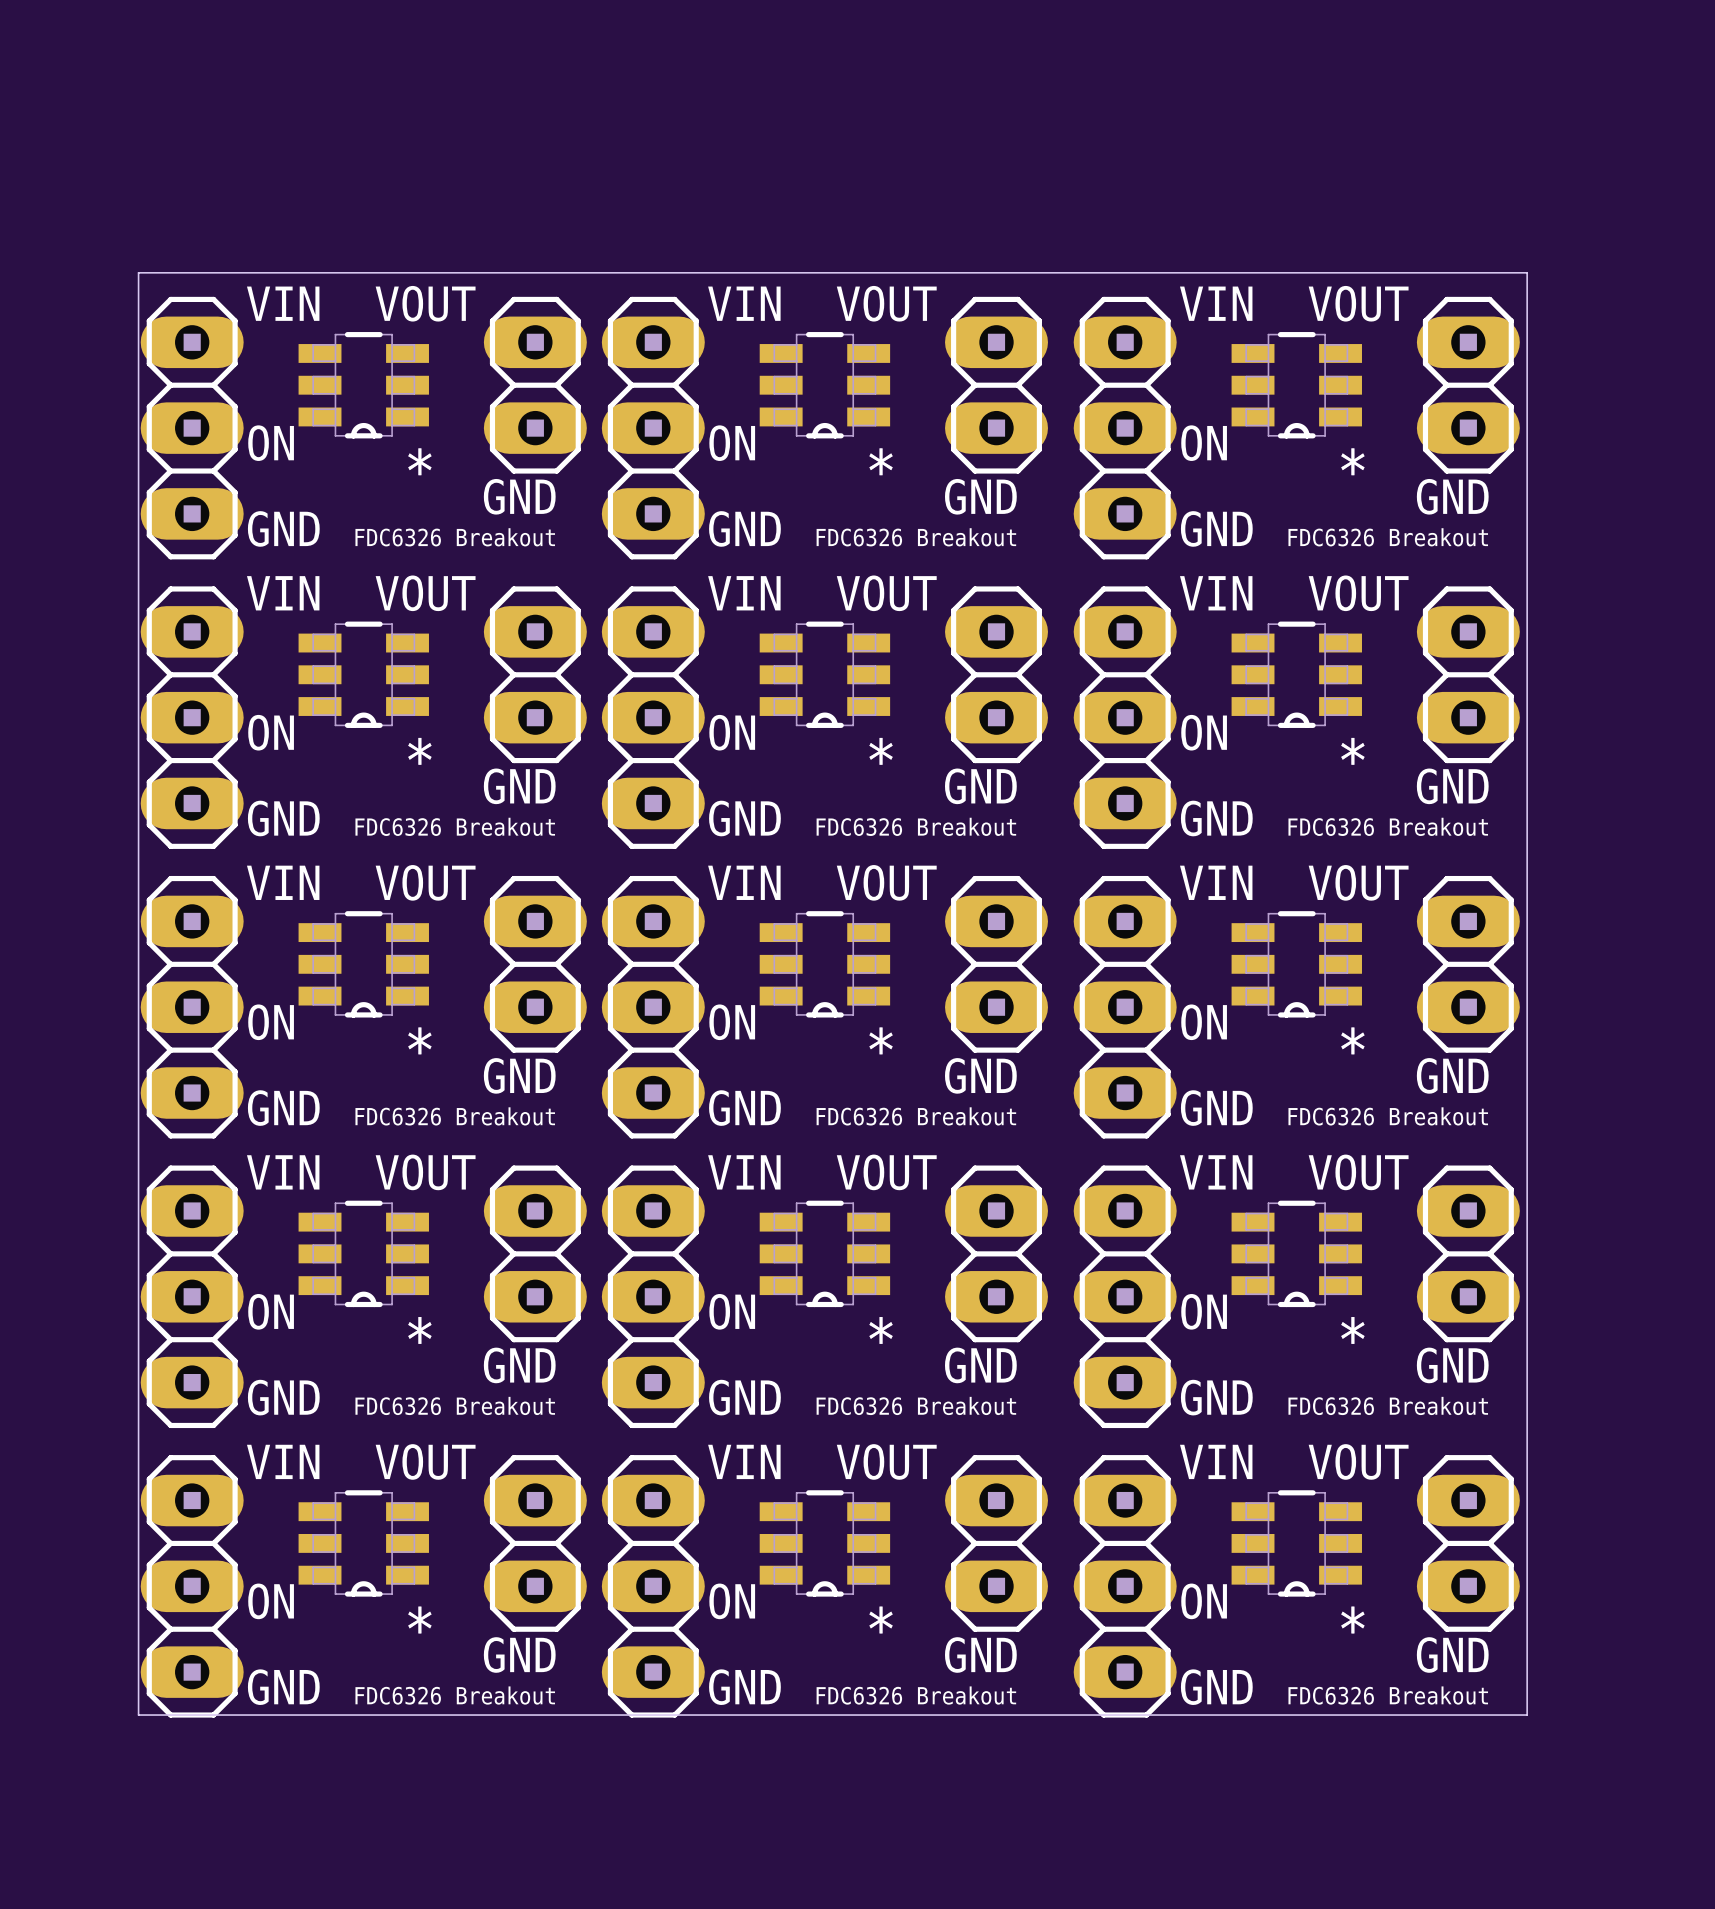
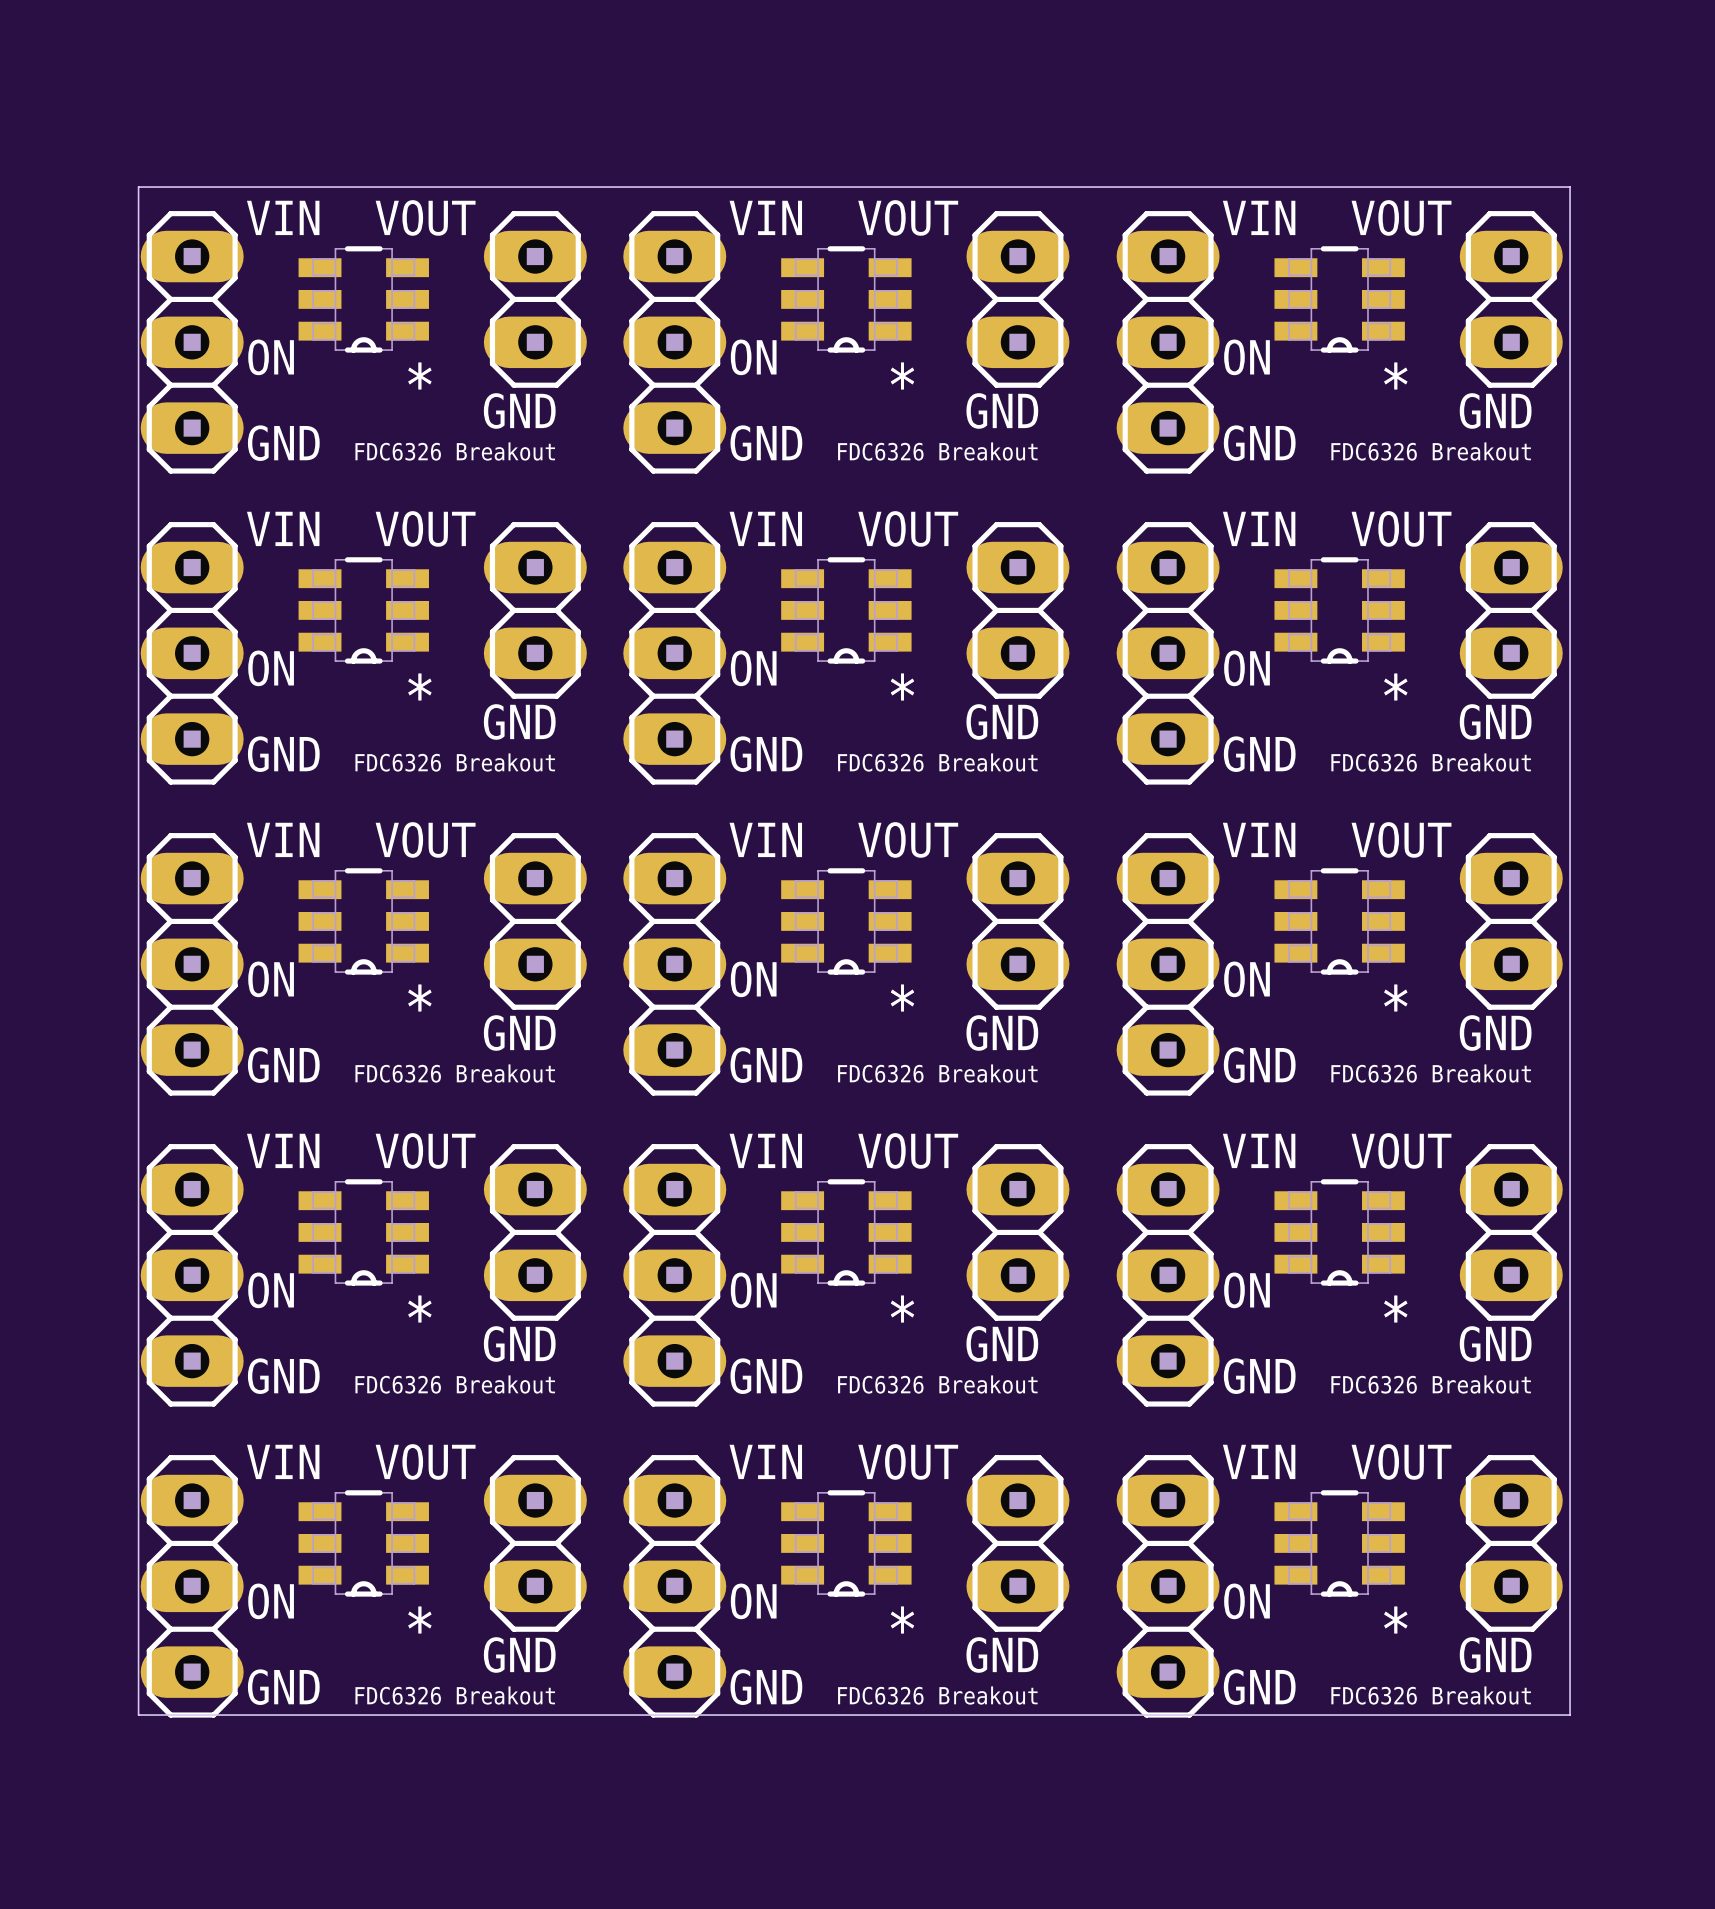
board edge: (138, 272) (1527, 272) (1527, 1715) -> (138, 272) (138, 187) (1570, 187) (1570, 1715) (1527, 1715)
text position: VIN (283, 303) -> VIN (283, 217)
text position: VOUT (425, 303) -> VOUT (425, 217)
text position: VIN (744, 303) -> VIN (765, 217)
text position: VOUT (886, 303) -> VOUT (908, 217)
text position: VIN (1216, 303) -> VIN (1259, 217)
text position: VOUT (1358, 303) -> VOUT (1401, 217)
text: none -> ON (271, 357)
part position: (363, 385) -> (363, 299)
part position: (535, 385) -> (535, 299)
part position: (824, 385) -> (846, 299)
part position: (996, 385) -> (1017, 299)
part position: (1296, 385) -> (1339, 299)
part position: (1468, 385) -> (1511, 299)
part position: (192, 428) -> (192, 342)
part position: (653, 428) -> (674, 342)
part position: (1125, 428) -> (1168, 342)
text: ON (271, 443) -> GND (283, 443)
text position: ON (732, 443) -> ON (753, 357)
text position: ON (1204, 443) -> ON (1246, 357)
text position: GND (519, 496) -> GND (519, 410)
text position: GND (980, 496) -> GND (1002, 410)
text position: GND (1452, 496) -> GND (1495, 410)
text: GND (283, 528) -> VIN (283, 528)
text position: GND (744, 528) -> GND (766, 443)
text position: GND (1216, 528) -> GND (1259, 443)
text position: FDC6326 Breakout (455, 537) -> FDC6326 Breakout (455, 451)
text position: FDC6326 Breakout (916, 537) -> FDC6326 Breakout (937, 451)
text position: FDC6326 Breakout (1388, 537) -> FDC6326 Breakout (1431, 451)
text: VIN (283, 593) -> none
text position: VOUT (425, 593) -> VOUT (425, 528)
text position: VIN (744, 593) -> VIN (765, 528)
text position: VOUT (886, 593) -> VOUT (908, 528)
text position: VIN (1216, 593) -> VIN (1259, 528)
text position: VOUT (1358, 593) -> VOUT (1401, 528)
part position: (363, 674) -> (363, 610)
part position: (535, 674) -> (535, 610)
part position: (824, 674) -> (846, 610)
part position: (996, 674) -> (1017, 610)
part position: (1296, 674) -> (1339, 610)
part position: (1468, 674) -> (1511, 610)
part position: (192, 717) -> (192, 653)
part position: (653, 717) -> (674, 653)
part position: (1125, 717) -> (1168, 653)
text position: ON (271, 732) -> ON (271, 668)
text position: ON (732, 732) -> ON (753, 668)
text position: ON (1204, 732) -> ON (1246, 668)
text position: GND (519, 786) -> GND (519, 721)
text position: GND (980, 786) -> GND (1002, 721)
text position: GND (1452, 786) -> GND (1495, 721)
text position: GND (283, 818) -> GND (283, 754)
text position: GND (744, 818) -> GND (766, 754)
text position: GND (1216, 818) -> GND (1259, 754)
text position: FDC6326 Breakout (455, 826) -> FDC6326 Breakout (455, 762)
text position: FDC6326 Breakout (916, 826) -> FDC6326 Breakout (937, 762)
text position: FDC6326 Breakout (1388, 826) -> FDC6326 Breakout (1431, 762)
text position: VIN (283, 882) -> VIN (283, 839)
text position: VOUT (425, 882) -> VOUT (425, 839)
text position: VIN (744, 882) -> VIN (765, 839)
text position: VOUT (886, 882) -> VOUT (908, 839)
text position: VIN (1216, 882) -> VIN (1259, 839)
text position: VOUT (1358, 882) -> VOUT (1401, 839)
part position: (363, 964) -> (363, 921)
part position: (535, 964) -> (535, 921)
part position: (824, 964) -> (846, 921)
part position: (996, 964) -> (1017, 921)
part position: (1296, 964) -> (1339, 921)
part position: (1468, 964) -> (1511, 921)
part position: (192, 1007) -> (192, 964)
part position: (653, 1007) -> (674, 964)
part position: (1125, 1007) -> (1168, 964)
text position: ON (271, 1022) -> ON (271, 979)
text position: ON (732, 1022) -> ON (753, 979)
text position: ON (1204, 1022) -> ON (1246, 979)
text position: GND (519, 1075) -> GND (519, 1032)
text position: GND (980, 1075) -> GND (1002, 1032)
text position: GND (1452, 1075) -> GND (1495, 1032)
text position: GND (283, 1108) -> GND (283, 1065)
text position: GND (744, 1108) -> GND (766, 1065)
text position: GND (1216, 1108) -> GND (1259, 1065)
text position: FDC6326 Breakout (455, 1116) -> FDC6326 Breakout (455, 1073)
text position: FDC6326 Breakout (916, 1116) -> FDC6326 Breakout (937, 1073)
text position: FDC6326 Breakout (1388, 1116) -> FDC6326 Breakout (1431, 1073)
text position: VIN (283, 1172) -> VIN (283, 1150)
text position: VOUT (425, 1172) -> VOUT (425, 1150)
text position: VIN (744, 1172) -> VIN (765, 1150)
text position: VOUT (886, 1172) -> VOUT (908, 1150)
text position: VIN (1216, 1172) -> VIN (1259, 1150)
text position: VOUT (1358, 1172) -> VOUT (1401, 1150)
part position: (363, 1253) -> (363, 1232)
part position: (535, 1253) -> (535, 1232)
part position: (824, 1253) -> (846, 1232)
part position: (996, 1253) -> (1017, 1232)
part position: (1296, 1253) -> (1339, 1232)
part position: (1468, 1253) -> (1511, 1232)
part position: (192, 1296) -> (192, 1275)
part position: (653, 1296) -> (674, 1275)
part position: (1125, 1296) -> (1168, 1275)
text position: ON (271, 1311) -> ON (271, 1290)
text position: ON (732, 1311) -> ON (753, 1290)
text position: ON (1204, 1311) -> ON (1246, 1290)
text position: GND (519, 1365) -> GND (519, 1343)
text position: GND (980, 1365) -> GND (1002, 1343)
text position: GND (1452, 1365) -> GND (1495, 1343)
text position: GND (283, 1397) -> GND (283, 1376)
text position: GND (744, 1397) -> GND (766, 1376)
text position: GND (1216, 1397) -> GND (1259, 1376)
text position: FDC6326 Breakout (455, 1405) -> FDC6326 Breakout (455, 1384)
text position: FDC6326 Breakout (916, 1405) -> FDC6326 Breakout (937, 1384)
text position: FDC6326 Breakout (1388, 1405) -> FDC6326 Breakout (1431, 1384)
text position: VIN (744, 1461) -> VIN (765, 1461)
text position: VOUT (886, 1461) -> VOUT (908, 1461)
text position: VIN (1216, 1461) -> VIN (1259, 1461)
text position: VOUT (1358, 1461) -> VOUT (1401, 1461)
part position: (824, 1543) -> (846, 1543)
part position: (996, 1543) -> (1017, 1543)
part position: (1296, 1543) -> (1339, 1543)
part position: (1468, 1543) -> (1511, 1543)
part position: (653, 1586) -> (674, 1586)
part position: (1125, 1586) -> (1168, 1586)
text position: ON (732, 1601) -> ON (753, 1601)
text position: ON (1204, 1601) -> ON (1246, 1601)
text position: GND (980, 1654) -> GND (1002, 1654)
text position: GND (1452, 1654) -> GND (1495, 1654)
text position: GND (744, 1687) -> GND (766, 1687)
text position: GND (1216, 1687) -> GND (1259, 1687)
text position: FDC6326 Breakout (916, 1695) -> FDC6326 Breakout (937, 1695)
text position: FDC6326 Breakout (1388, 1695) -> FDC6326 Breakout (1431, 1695)

